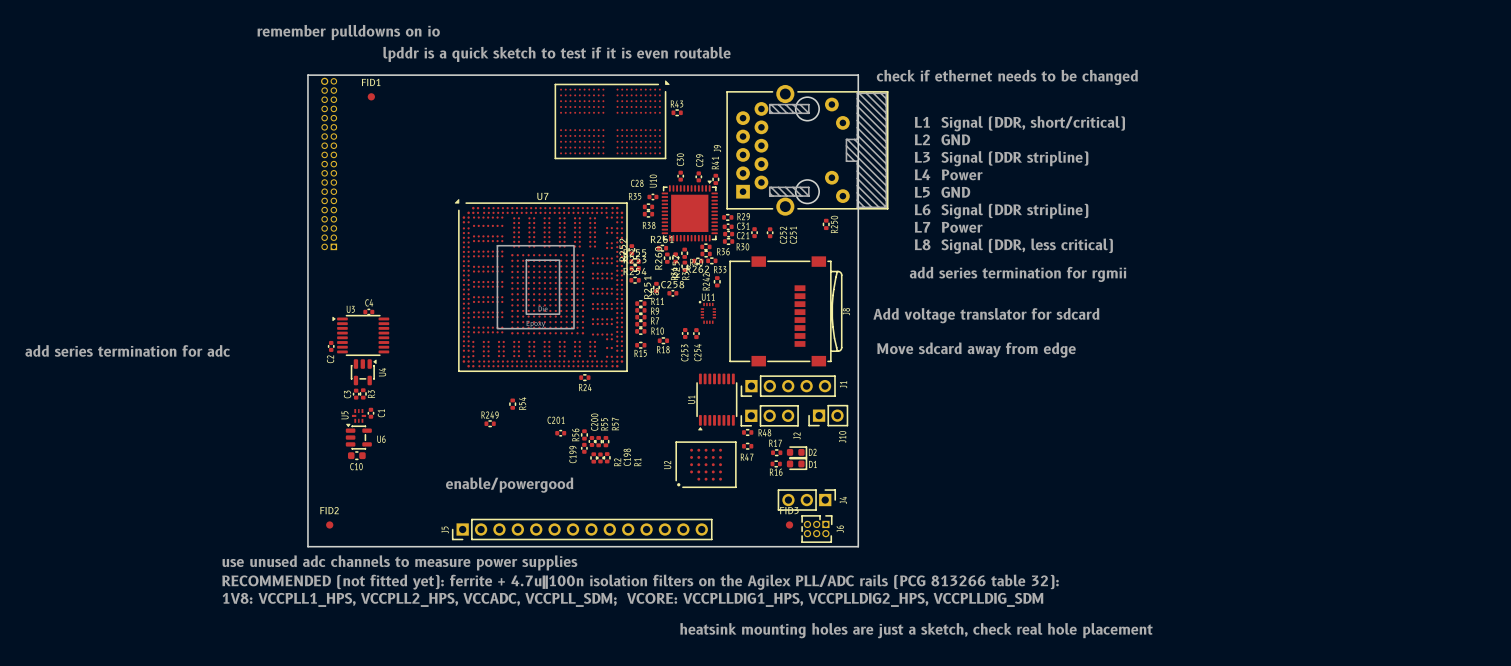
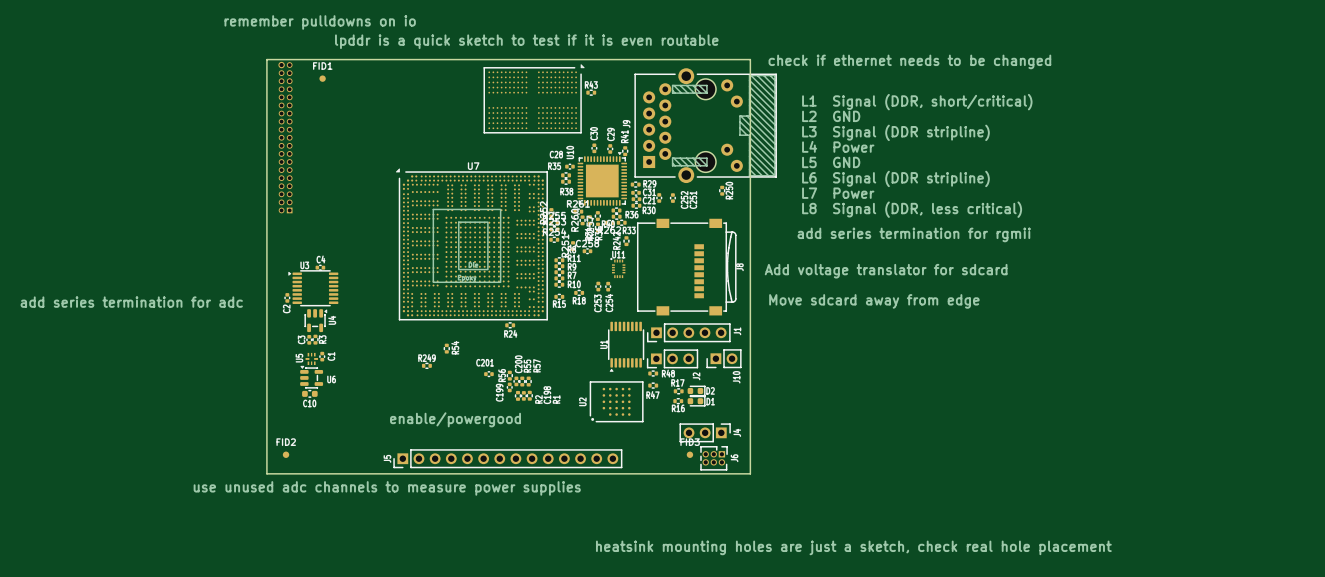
text: RECOMMENDED (not fitted yet): ferrite + 4.7u||100n isolation filters on the Agilex PLL/ADC rails (PCG 813266 table 32): (640, 582) -> none
text: 1V8: VCCPLL1_HPS, VCCPLL2_HPS, VCCADC, VCCPLL_SDM; VCORE: VCCPLLDIG1_HPS, VCCPLLDIG2_HPS, VCCPLLDIG_SDM (632, 599) -> none

